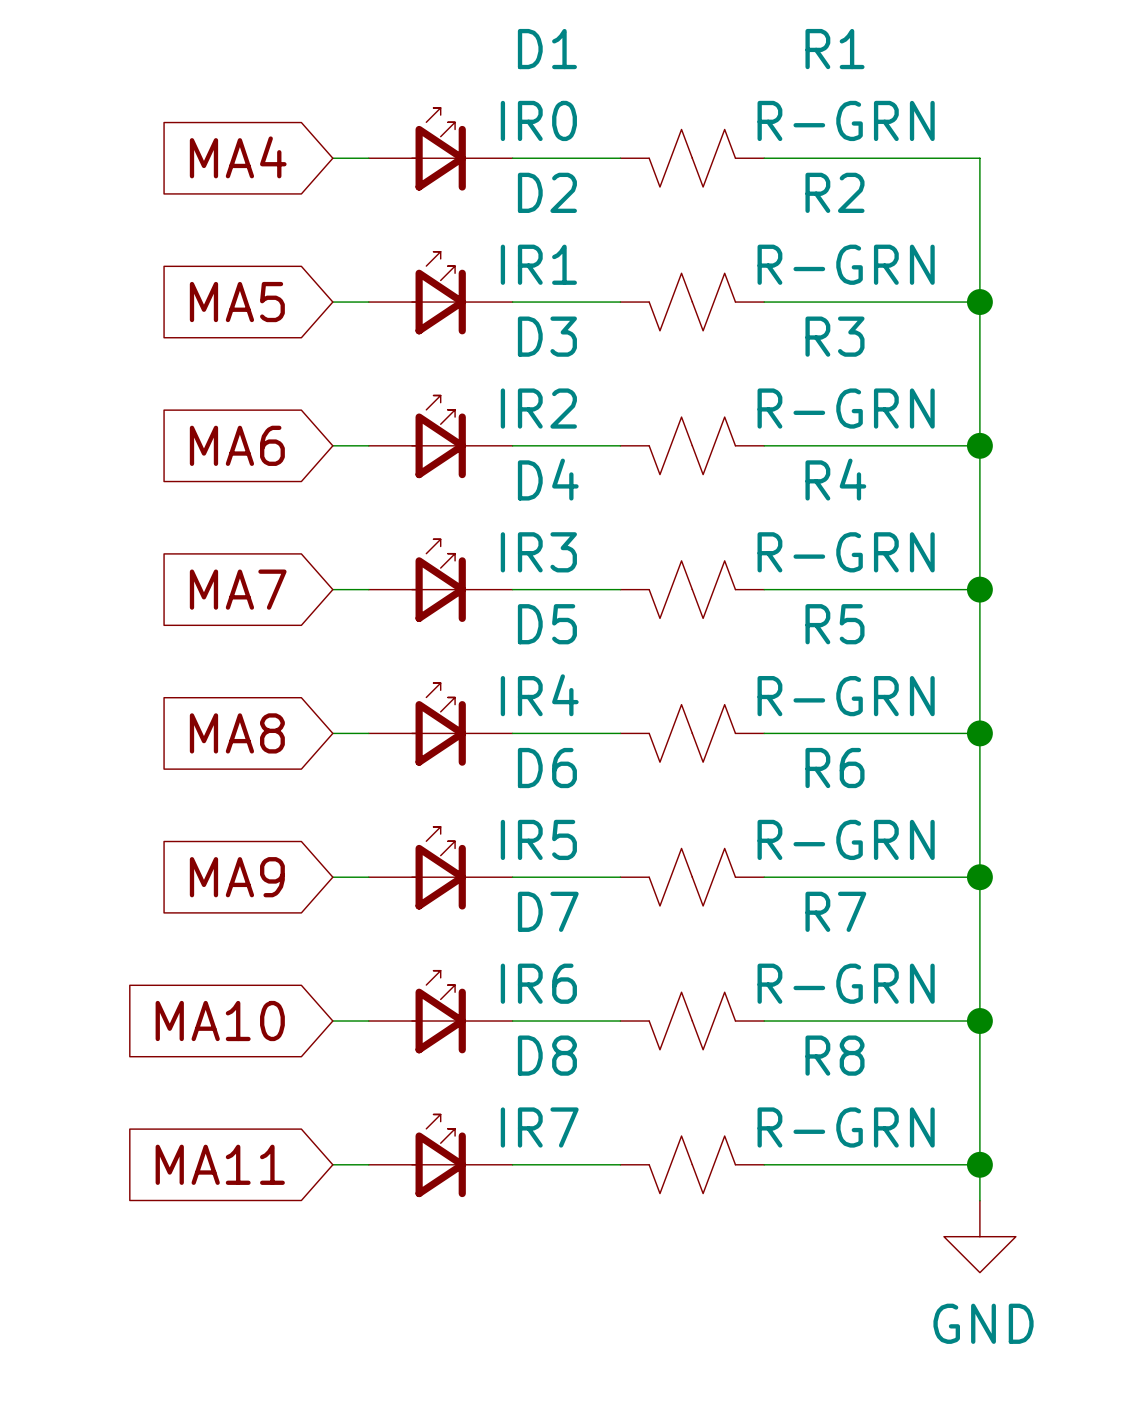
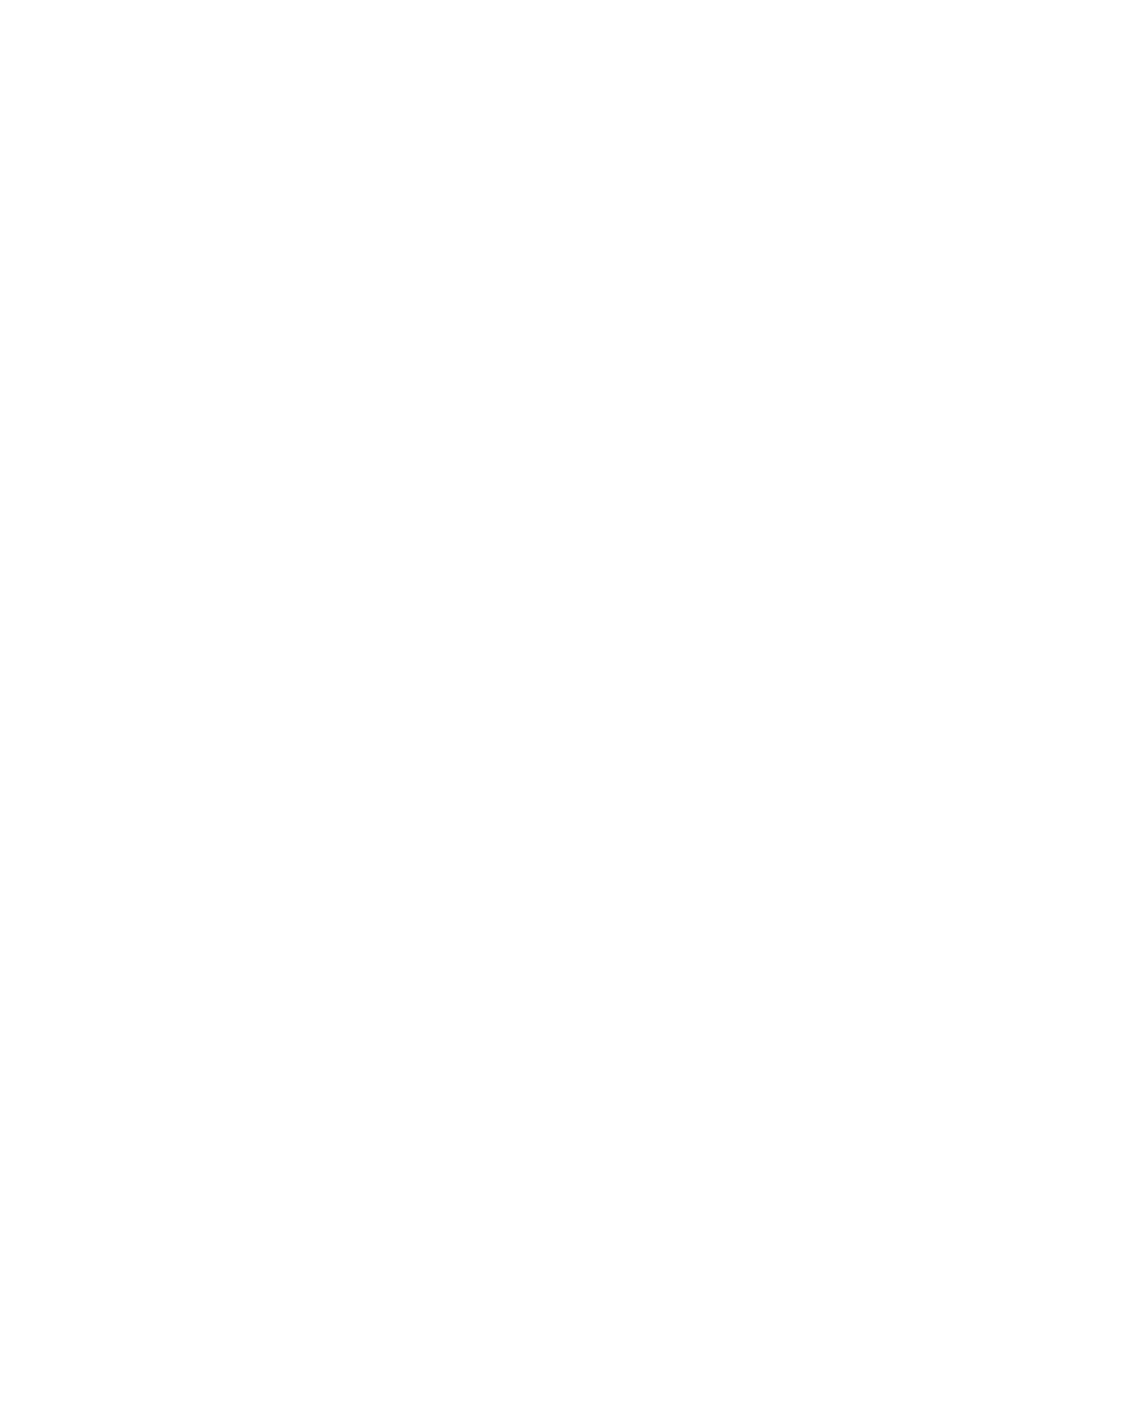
D1: IR0 (440, 149) -> none
global label: MA4 (238, 157) -> none
wire: (332, 158) (368, 158) -> none
wire: (512, 158) (620, 158) -> none
R1: R-GRN (692, 158) -> none
wire: (764, 158) (979, 158) (979, 1200) -> none
D2: IR1 (440, 293) -> none
global label: MA5 (237, 302) -> none
wire: (332, 302) (368, 302) -> none
wire: (512, 302) (620, 302) -> none
R2: R-GRN (692, 302) -> none
wire: (764, 302) (979, 302) -> none
junction: (979, 302) -> none
D3: IR2 (440, 436) -> none
global label: MA6 (237, 445) -> none
wire: (332, 445) (368, 445) -> none
wire: (512, 445) (620, 445) -> none
R3: R-GRN (692, 445) -> none
wire: (764, 445) (979, 445) -> none
junction: (979, 445) -> none
D4: IR3 (440, 580) -> none
global label: MA7 (238, 589) -> none
wire: (332, 589) (368, 589) -> none
wire: (512, 589) (620, 589) -> none
R4: R-GRN (692, 589) -> none
wire: (764, 589) (979, 589) -> none
junction: (979, 589) -> none
D5: IR4 (440, 724) -> none
global label: MA8 (237, 733) -> none
wire: (332, 733) (368, 733) -> none
wire: (512, 733) (620, 733) -> none
R5: R-GRN (692, 733) -> none
wire: (764, 733) (979, 733) -> none
junction: (979, 733) -> none
D6: IR5 (440, 868) -> none
global label: MA9 (237, 877) -> none
wire: (332, 877) (368, 877) -> none
wire: (512, 877) (620, 877) -> none
R6: R-GRN (692, 877) -> none
wire: (764, 877) (979, 877) -> none
junction: (979, 877) -> none
D7: IR6 (440, 1012) -> none
global label: MA10 (220, 1021) -> none
wire: (332, 1021) (368, 1021) -> none
wire: (512, 1021) (620, 1021) -> none
R7: R-GRN (692, 1021) -> none
wire: (764, 1021) (979, 1021) -> none
junction: (979, 1021) -> none
D8: IR7 (440, 1155) -> none
global label: MA11 (220, 1164) -> none
wire: (332, 1164) (368, 1164) -> none
wire: (512, 1164) (620, 1164) -> none
R8: R-GRN (692, 1164) -> none
wire: (764, 1164) (979, 1164) -> none
junction: (979, 1164) -> none
power symbol: GND (979, 1236) -> none

